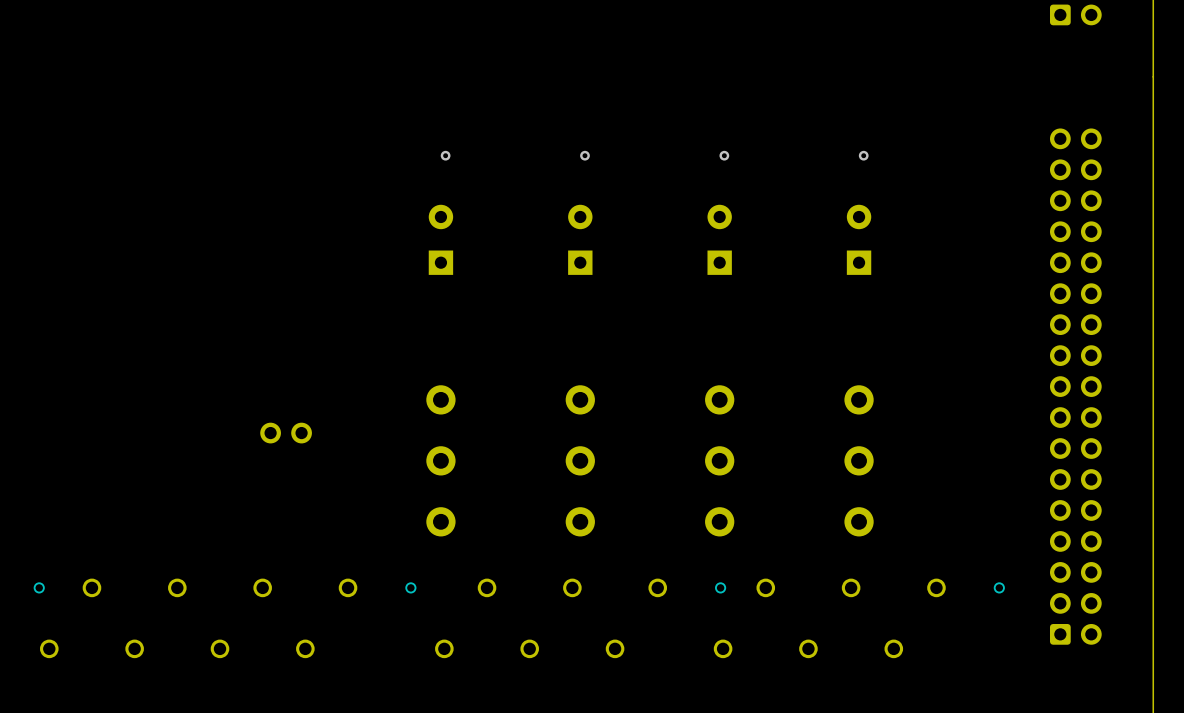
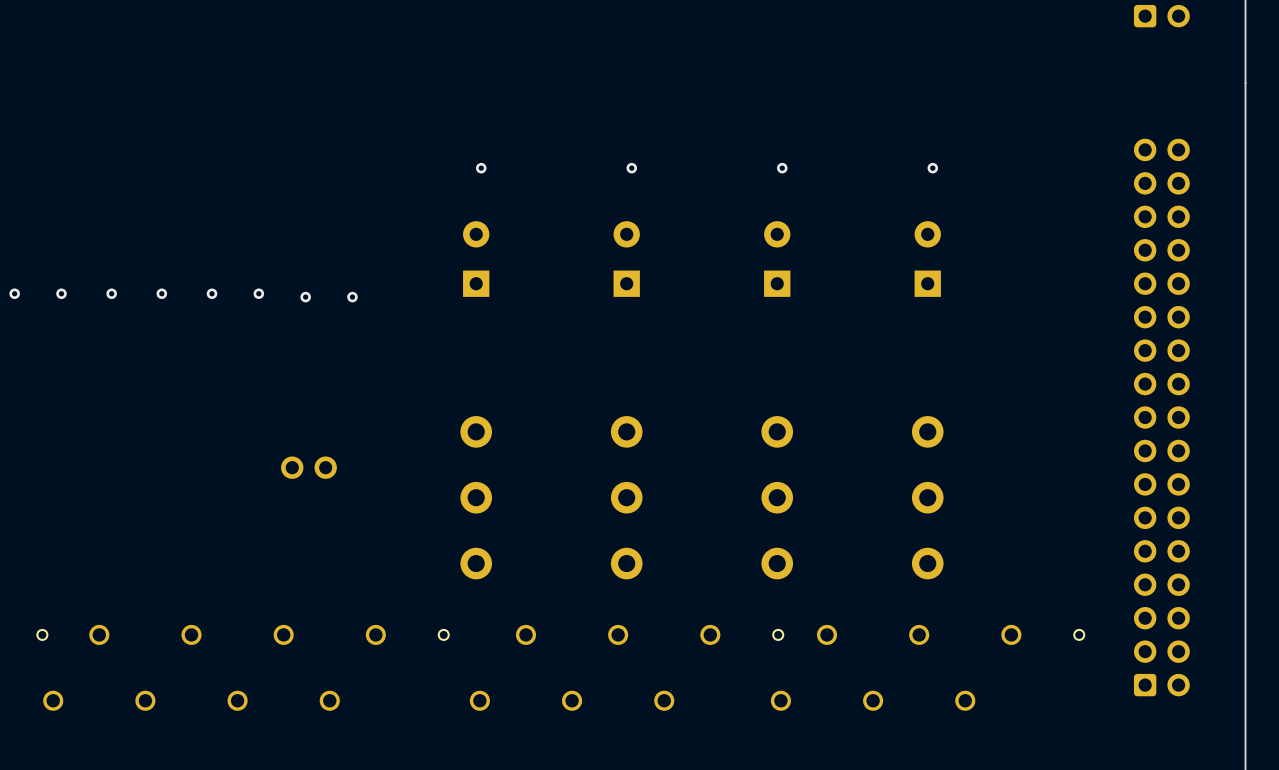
via: none -> (14, 293)
via: none -> (61, 293)
via: none -> (111, 293)
via: none -> (161, 293)
via: none -> (212, 293)
via: none -> (258, 293)
via: none -> (305, 297)
via: none -> (352, 297)

